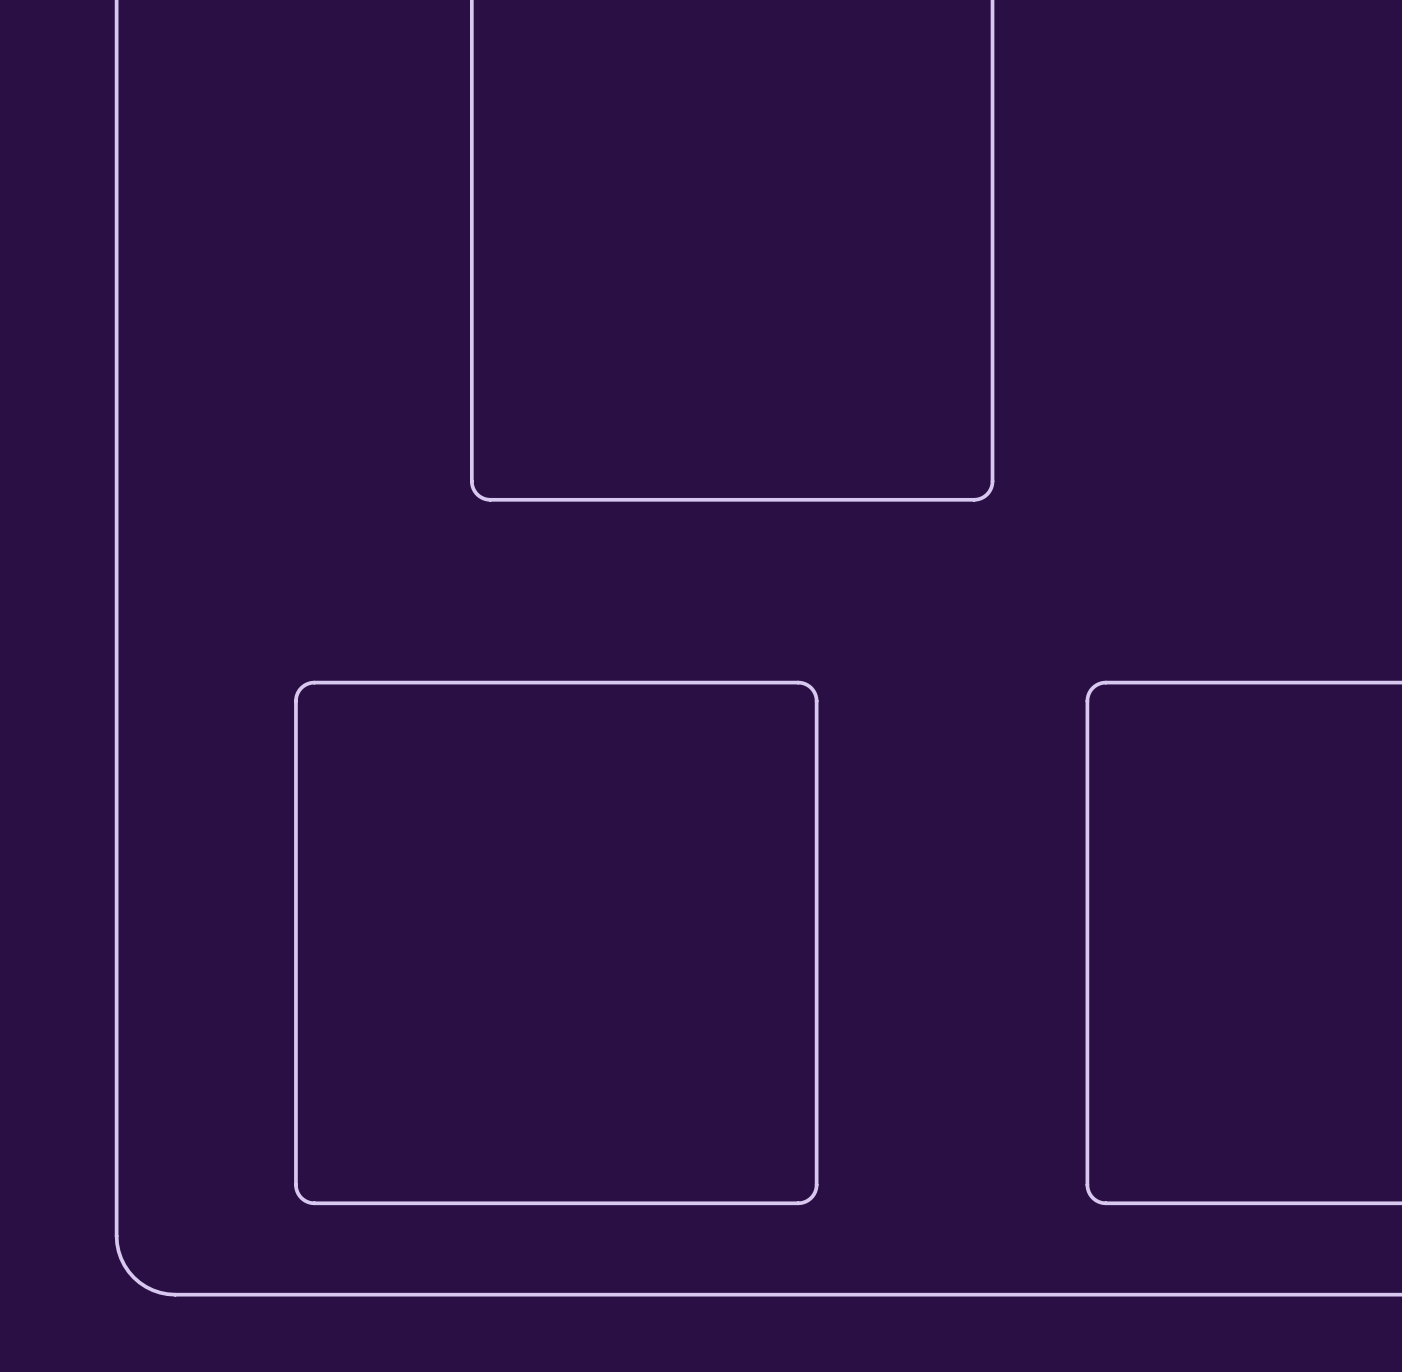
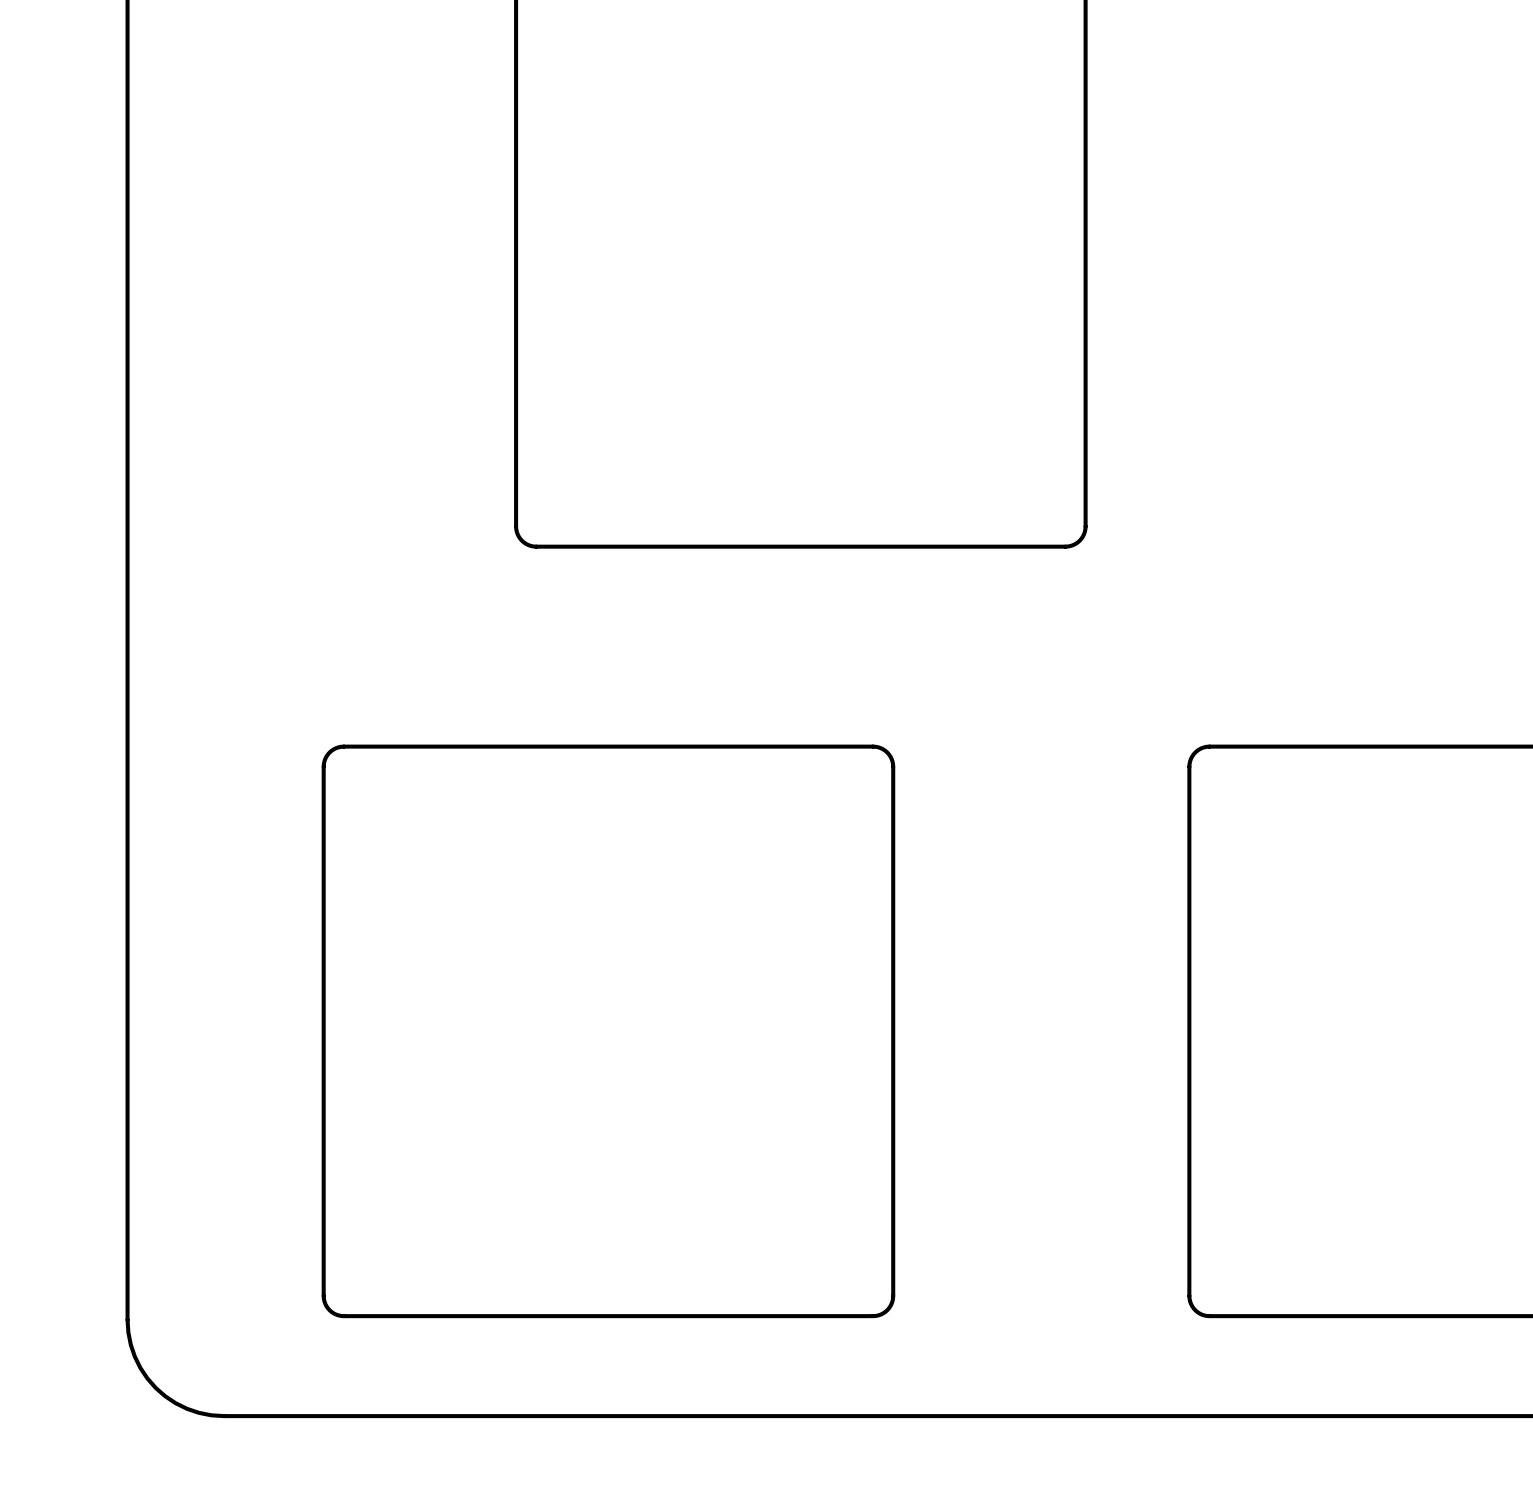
board edge: (116, 1206) (118, 1251) (124, 1265) (133, 1277) (145, 1286) (160, 1292) (204, 1294) -> (127, 1319) (130, 1344) (134, 1356) (140, 1368) (155, 1387) (165, 1396) (186, 1408) (198, 1412) (223, 1416)

